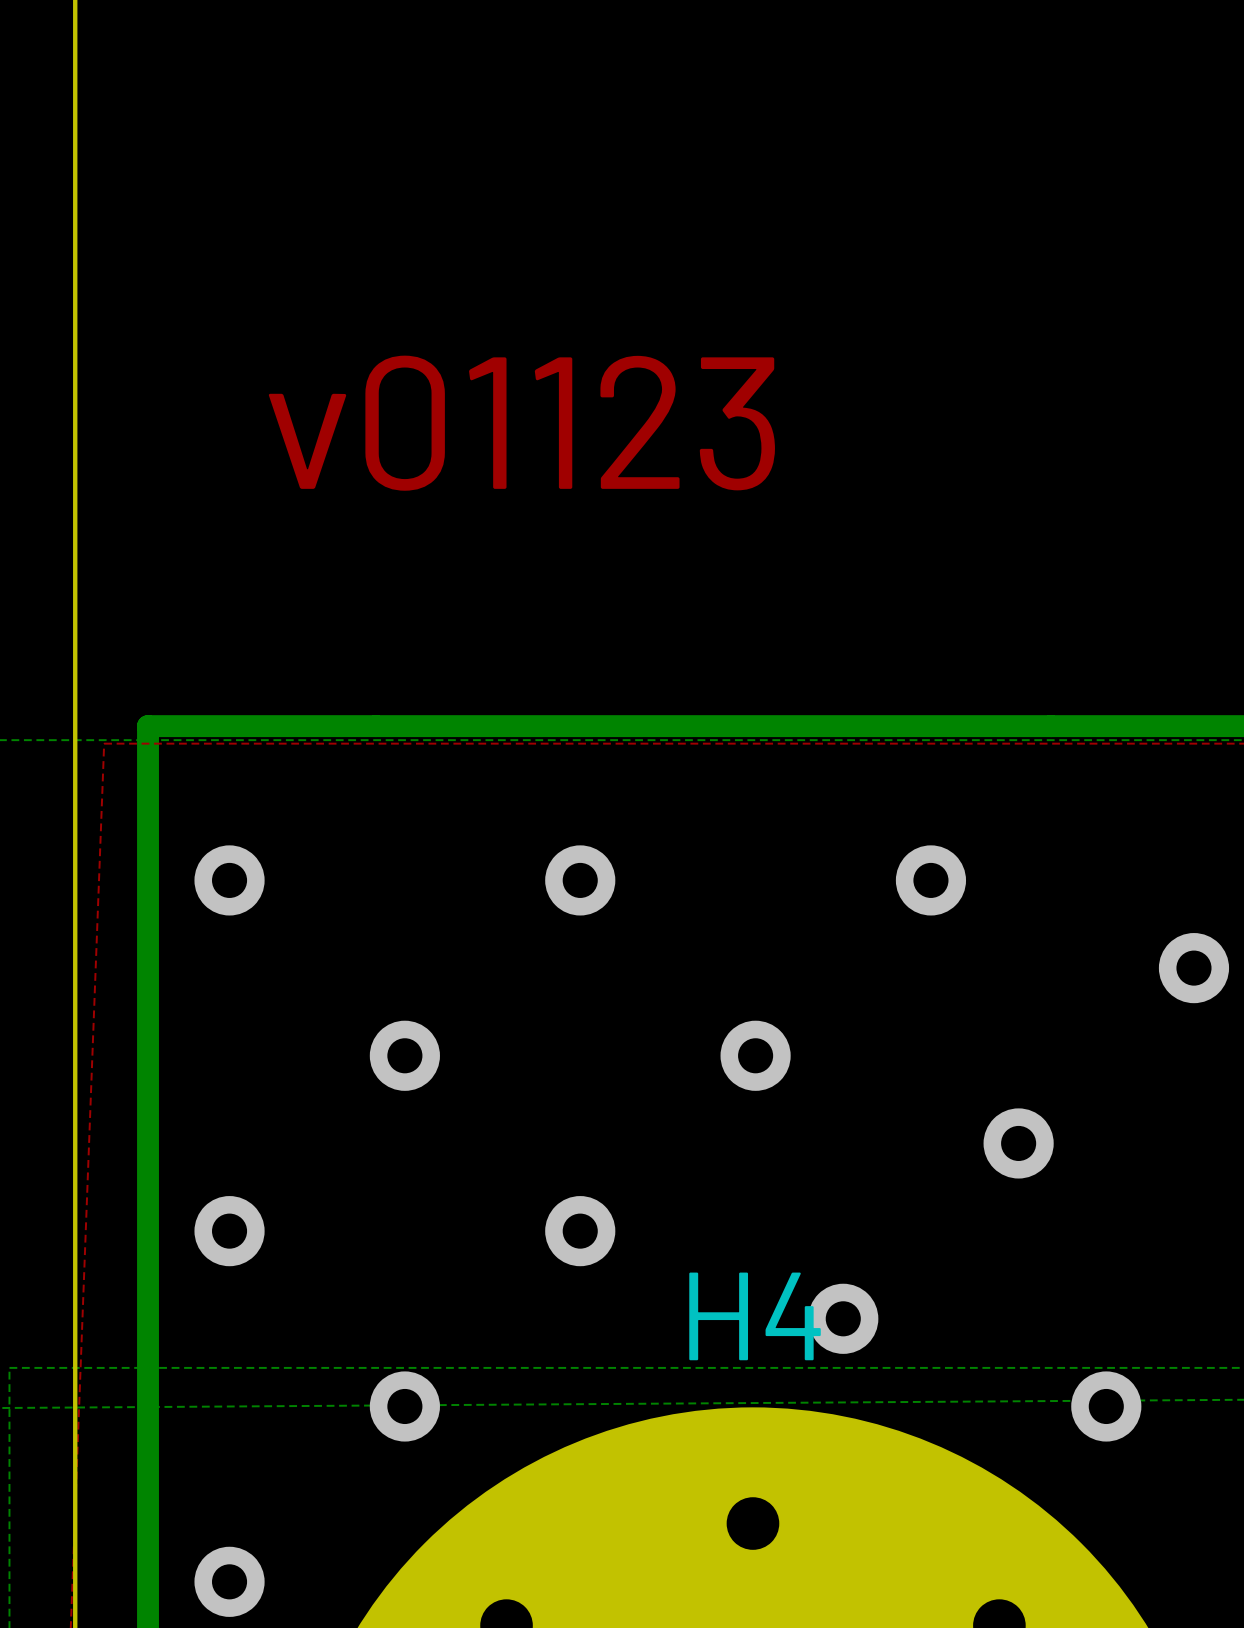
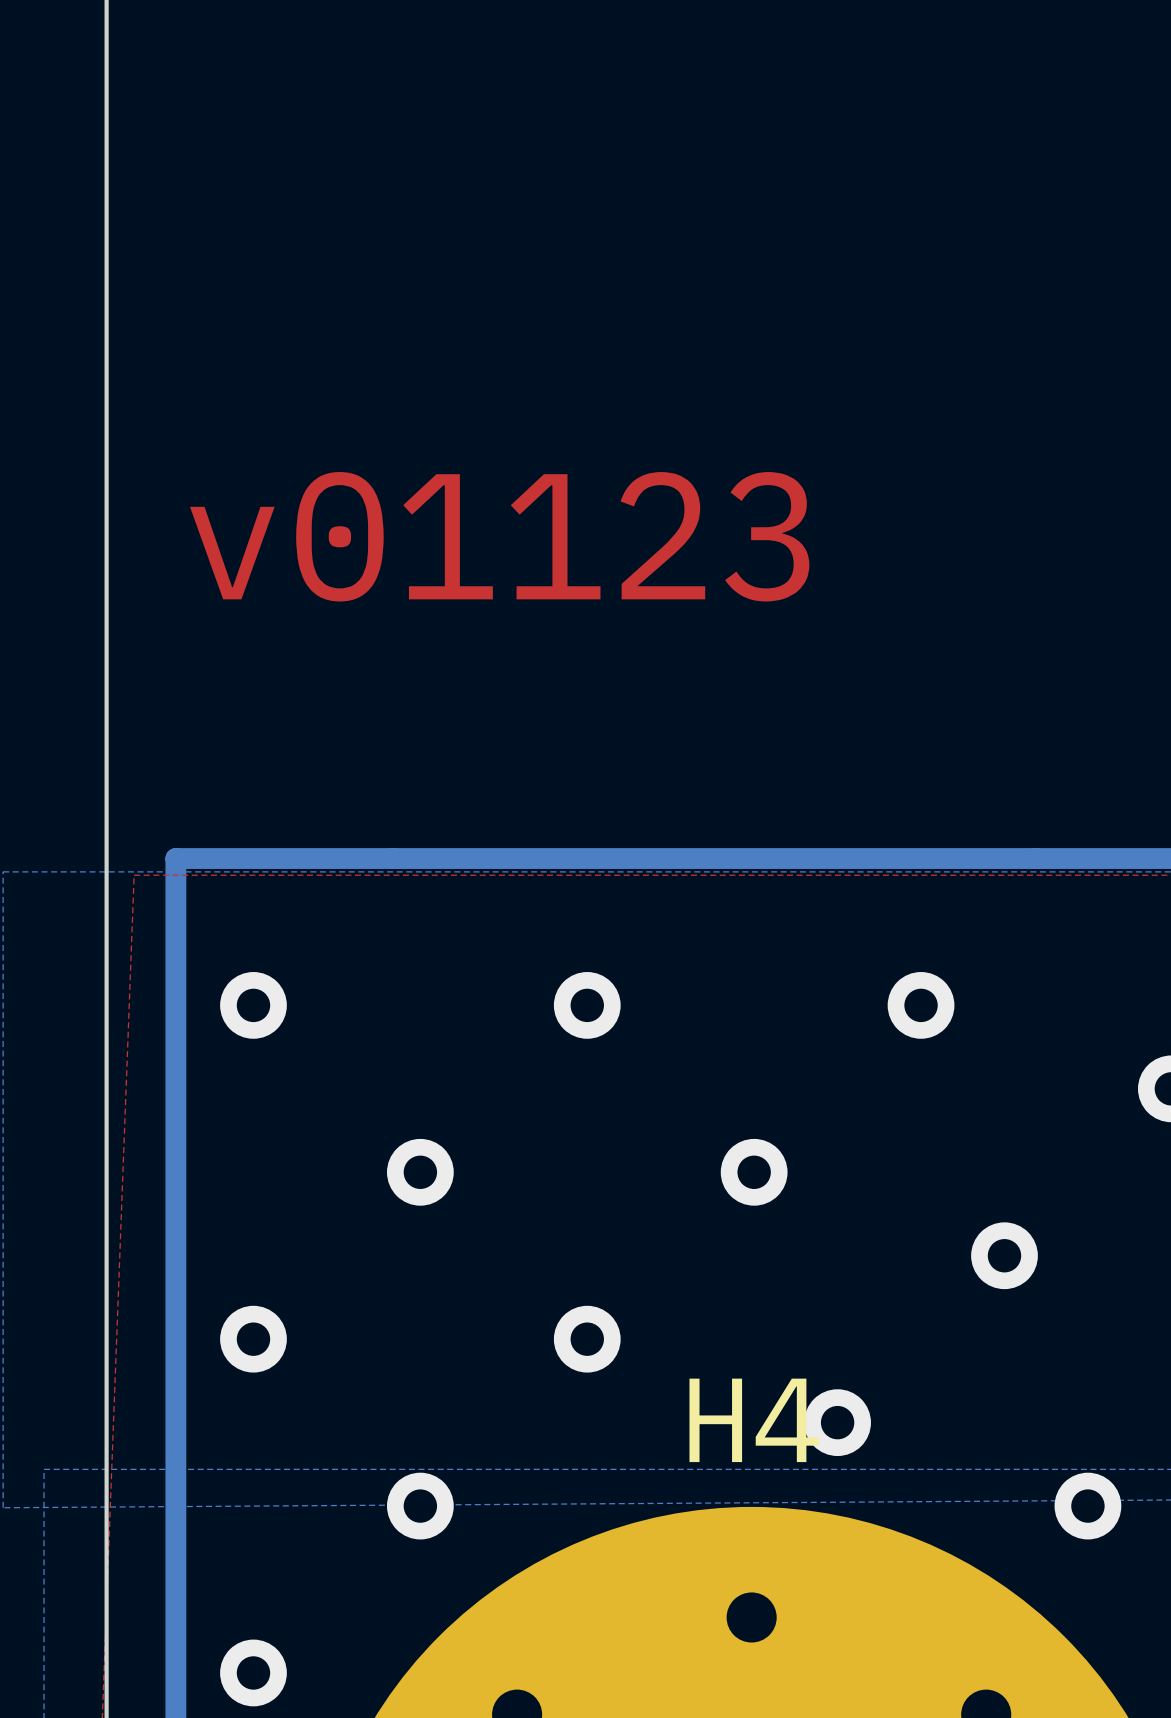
text position: v01123 (521, 423) -> v01123 (499, 536)

